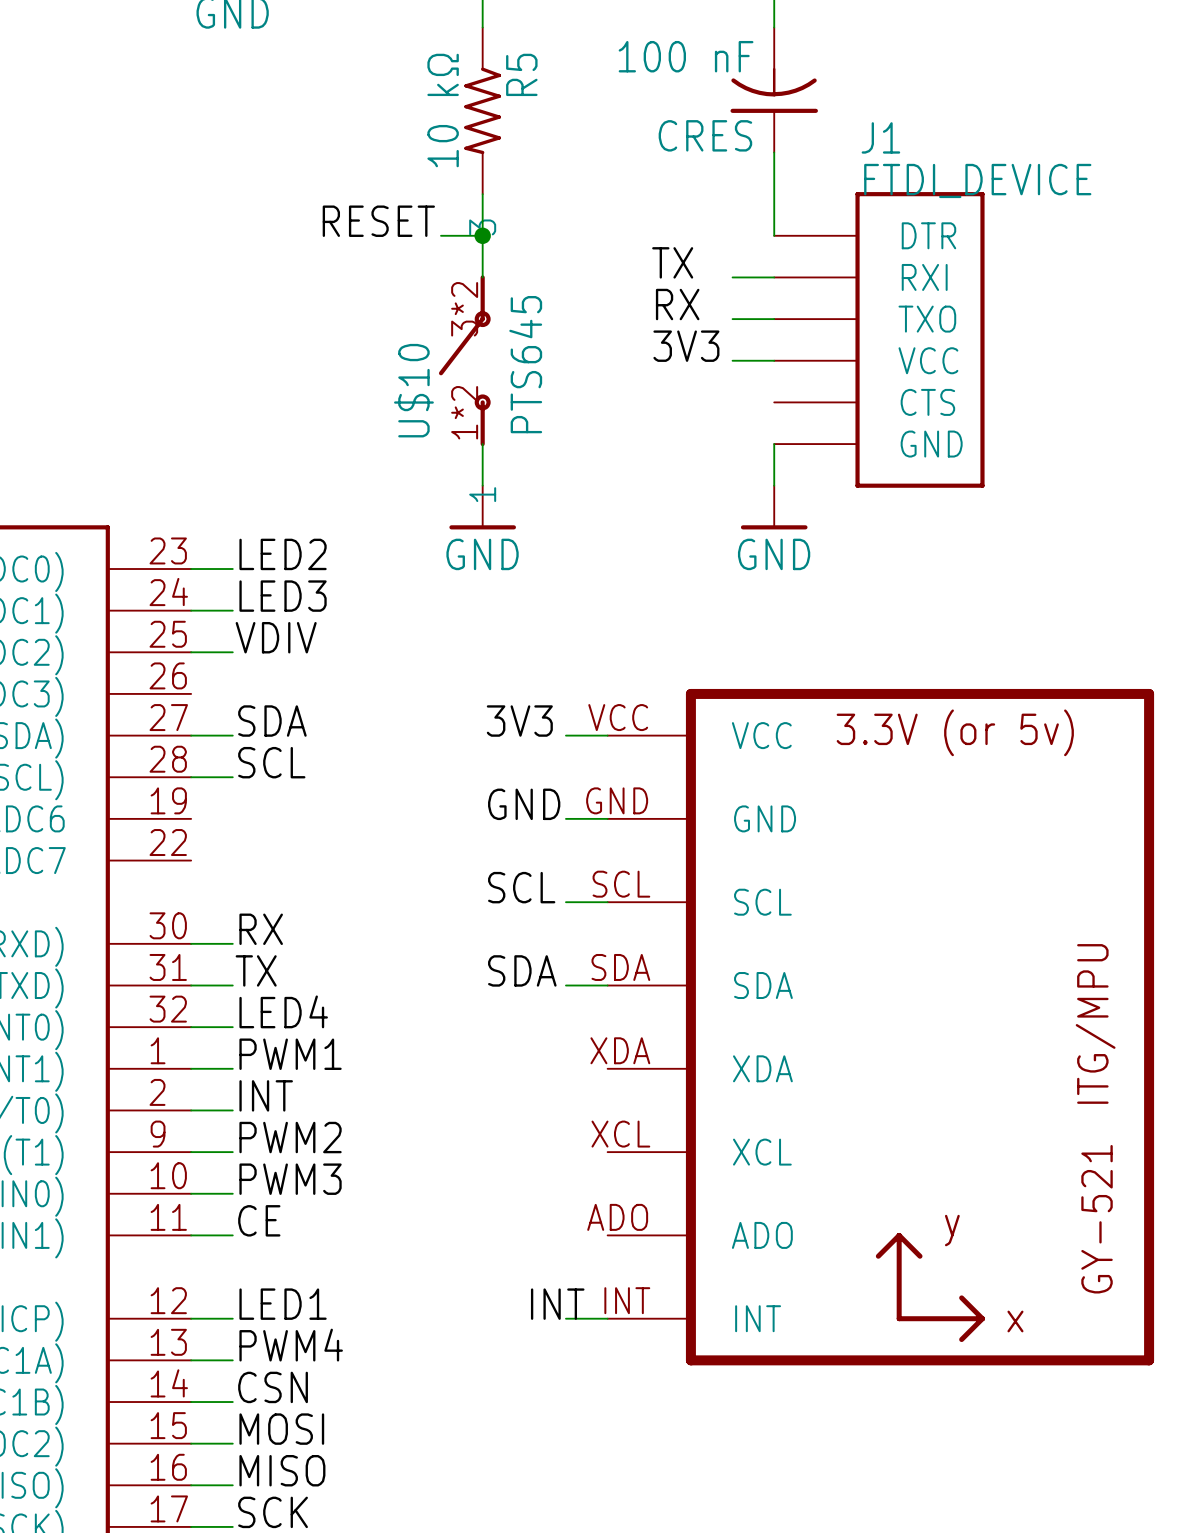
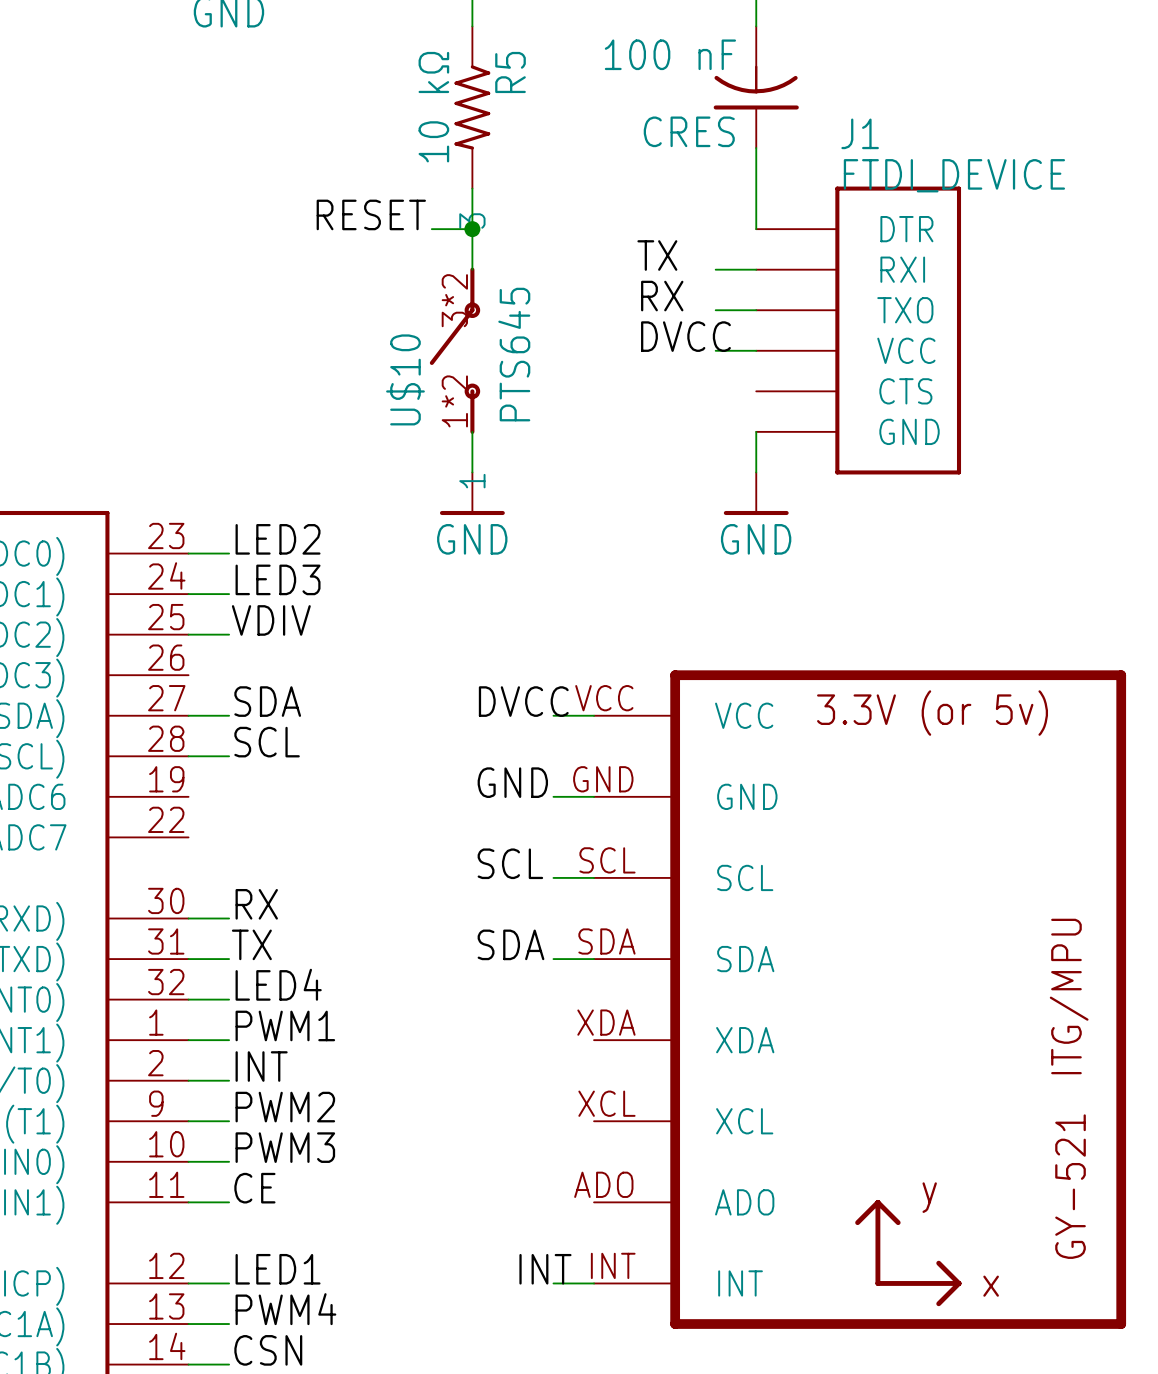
label: 3V3 (686, 346) -> DVCC (685, 336)
label: 3V3 (519, 721) -> DVCC (523, 701)

